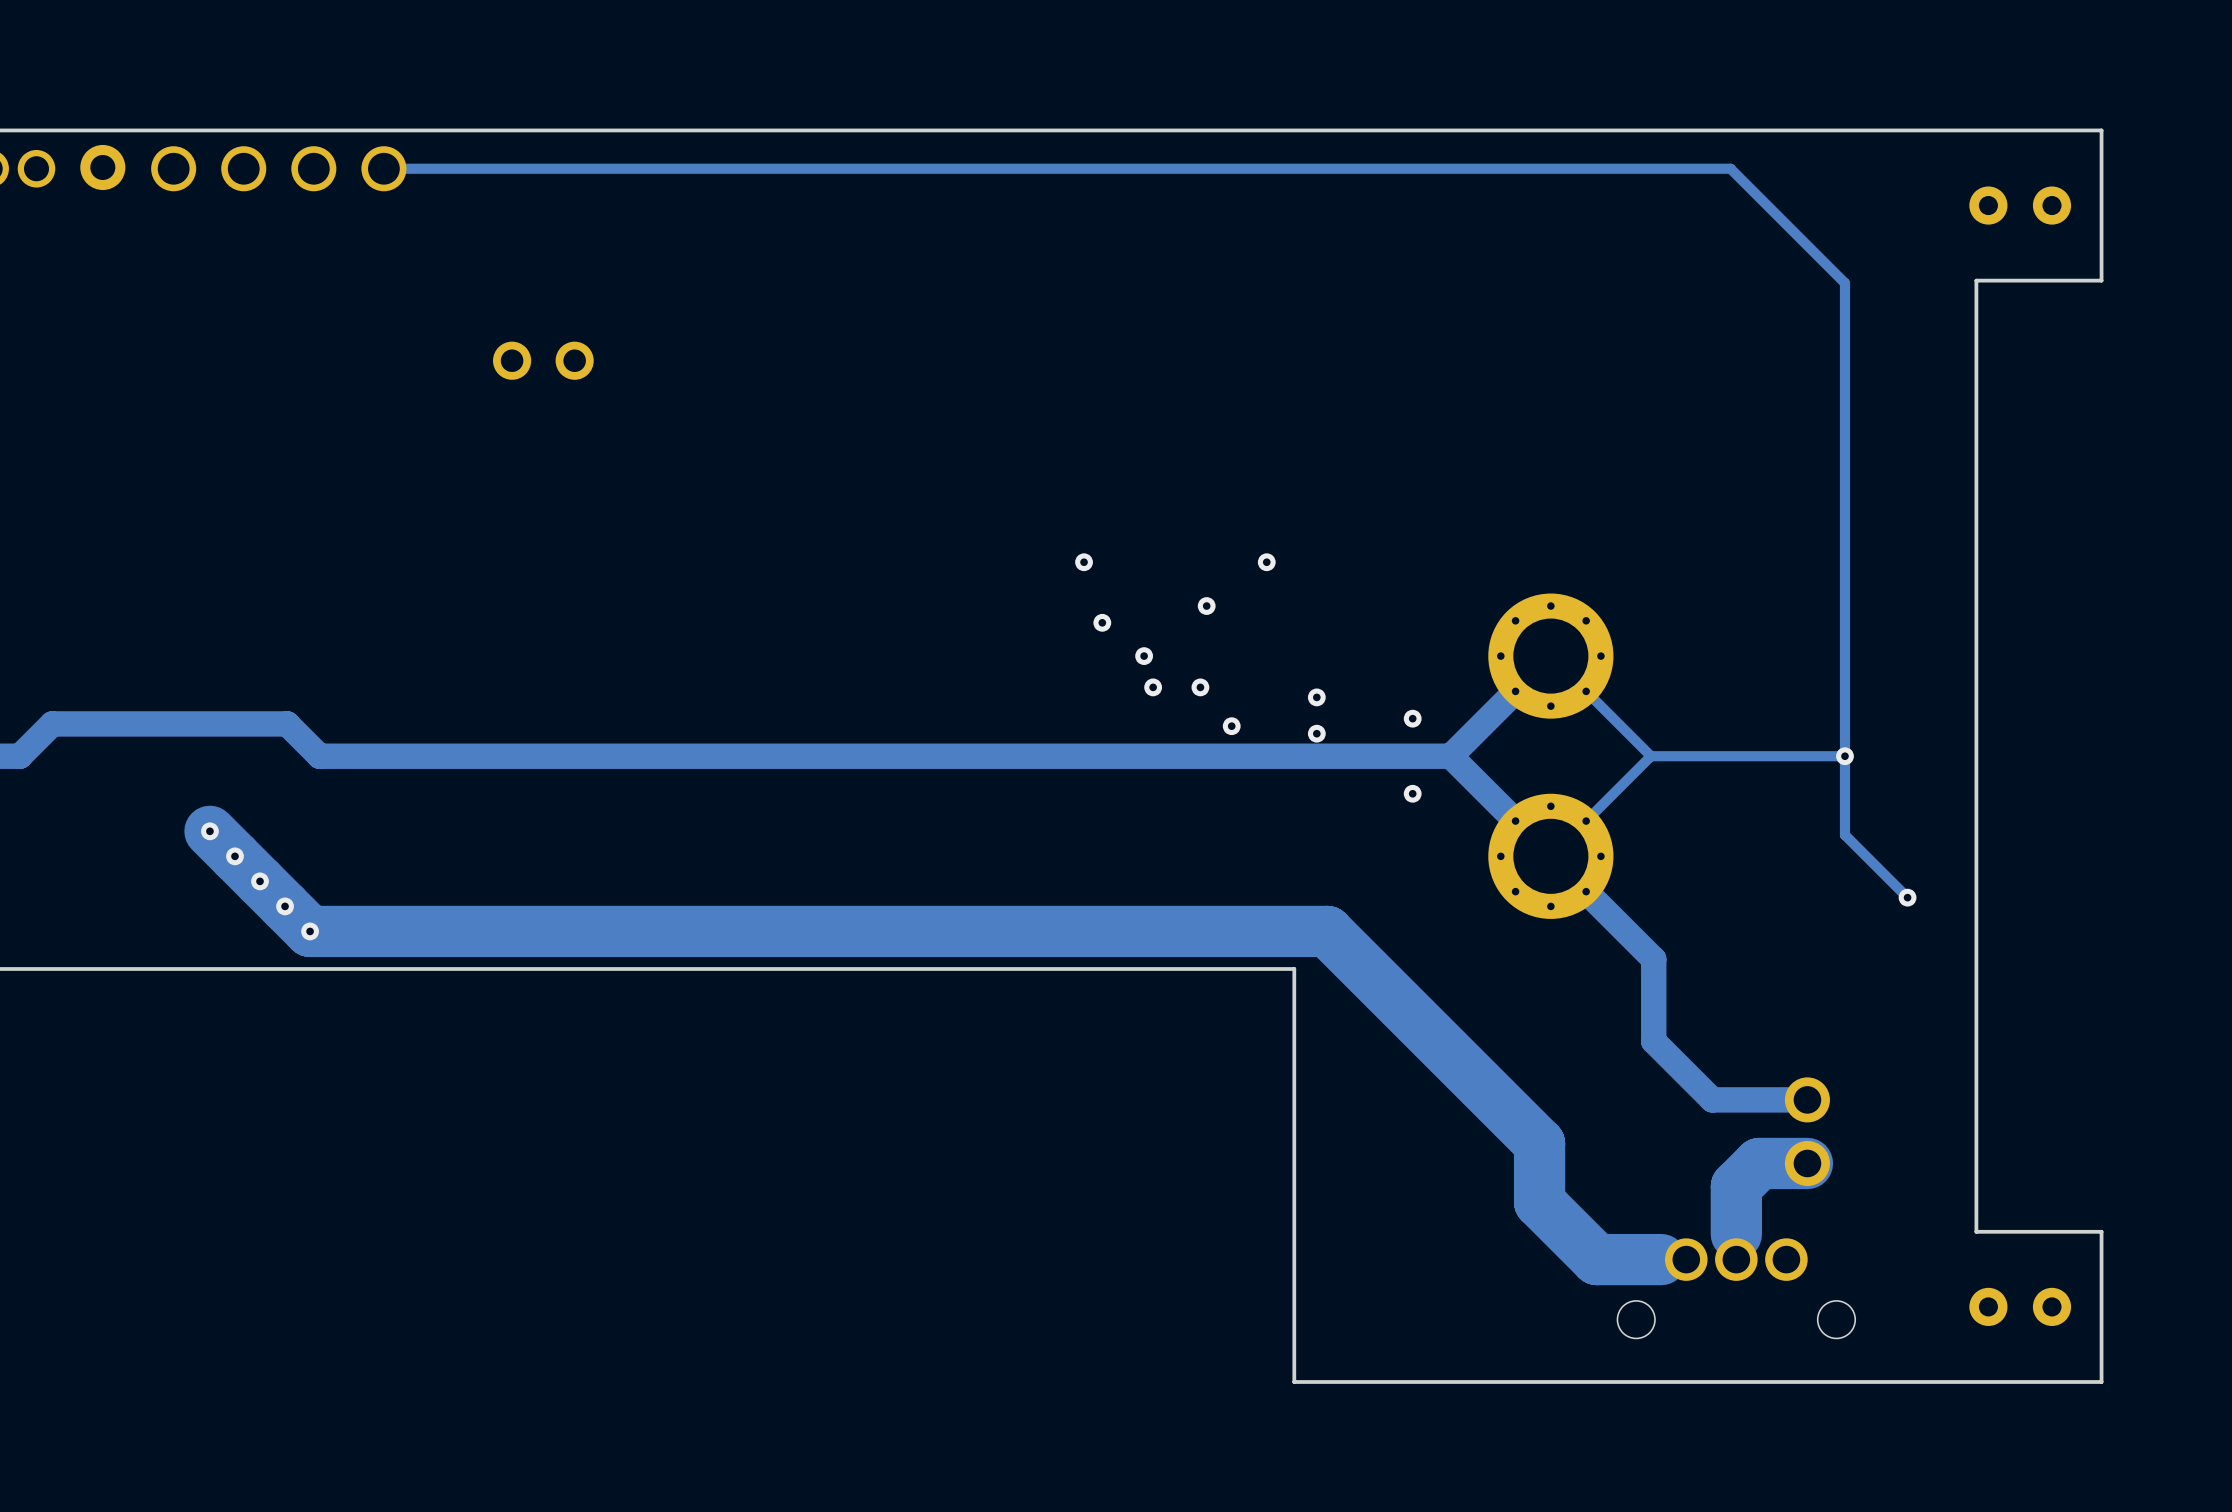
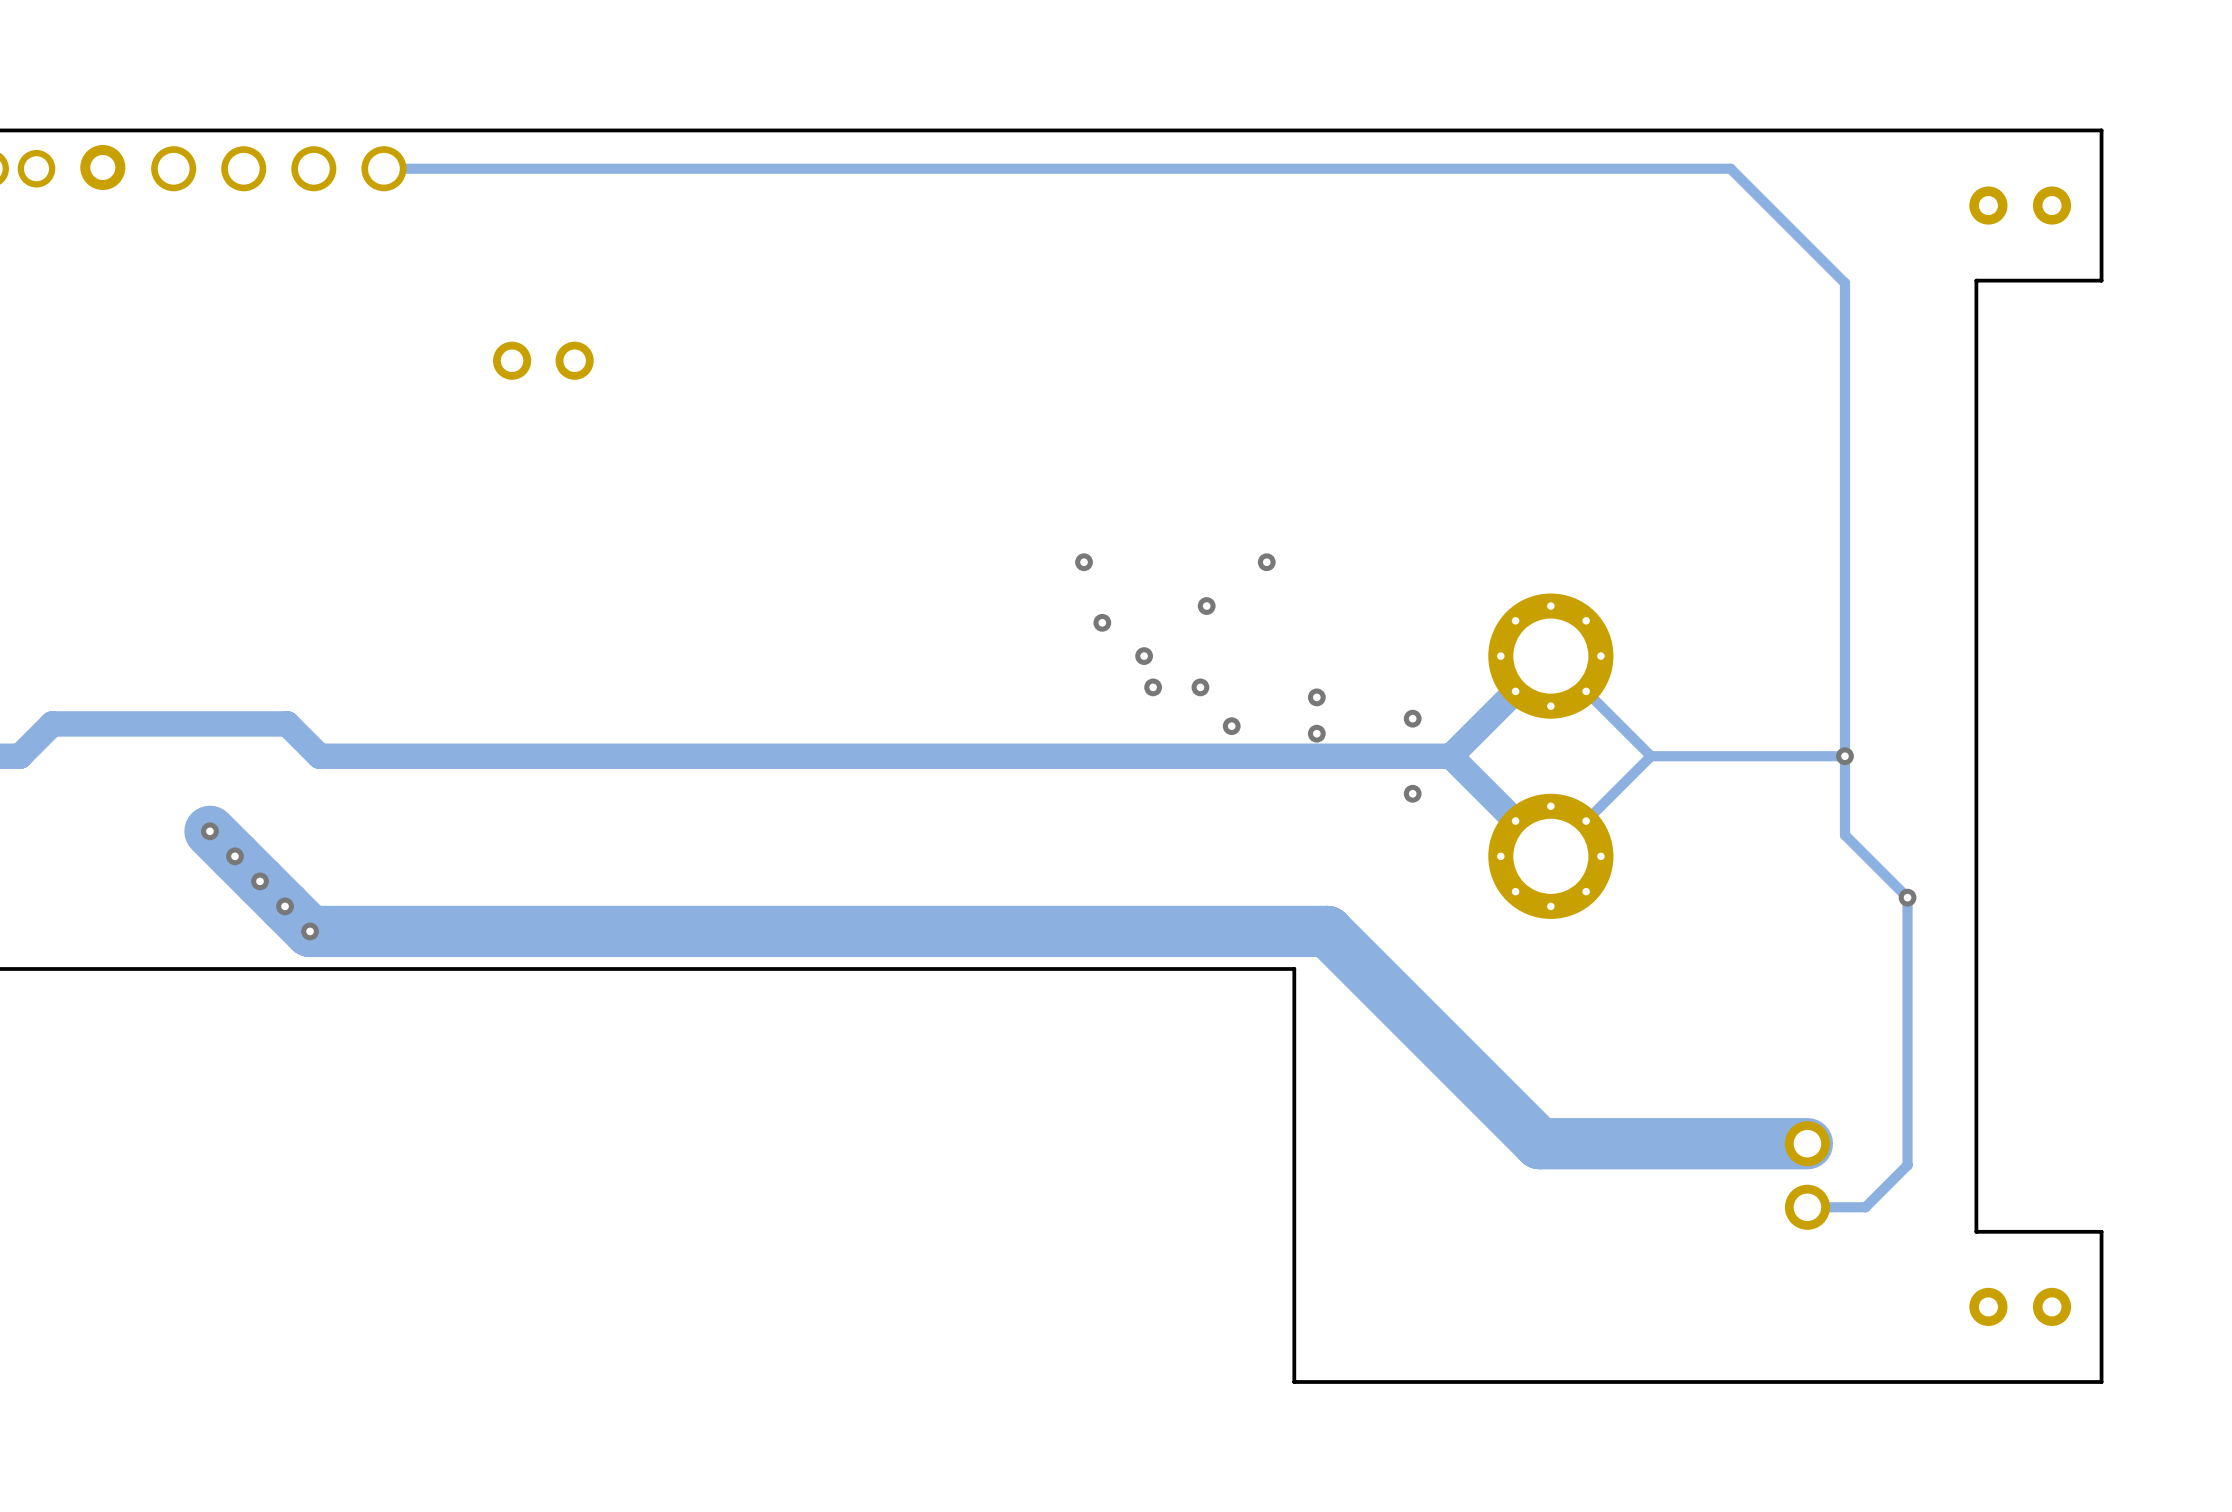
track: (1550, 856) (1653, 959) (1653, 1041) (1712, 1099) (1807, 1099) -> none
track: none -> (1907, 897) (1907, 1165) (1865, 1207) (1807, 1207)
part position: (1807, 1131) -> (1807, 1175)
track: (1539, 1143) (1539, 1202) (1596, 1259) (1686, 1259) -> (1539, 1143) (1807, 1143)
track: (1807, 1163) (1759, 1163) (1736, 1186) (1736, 1259) -> none
part: (1736, 1288) -> none

